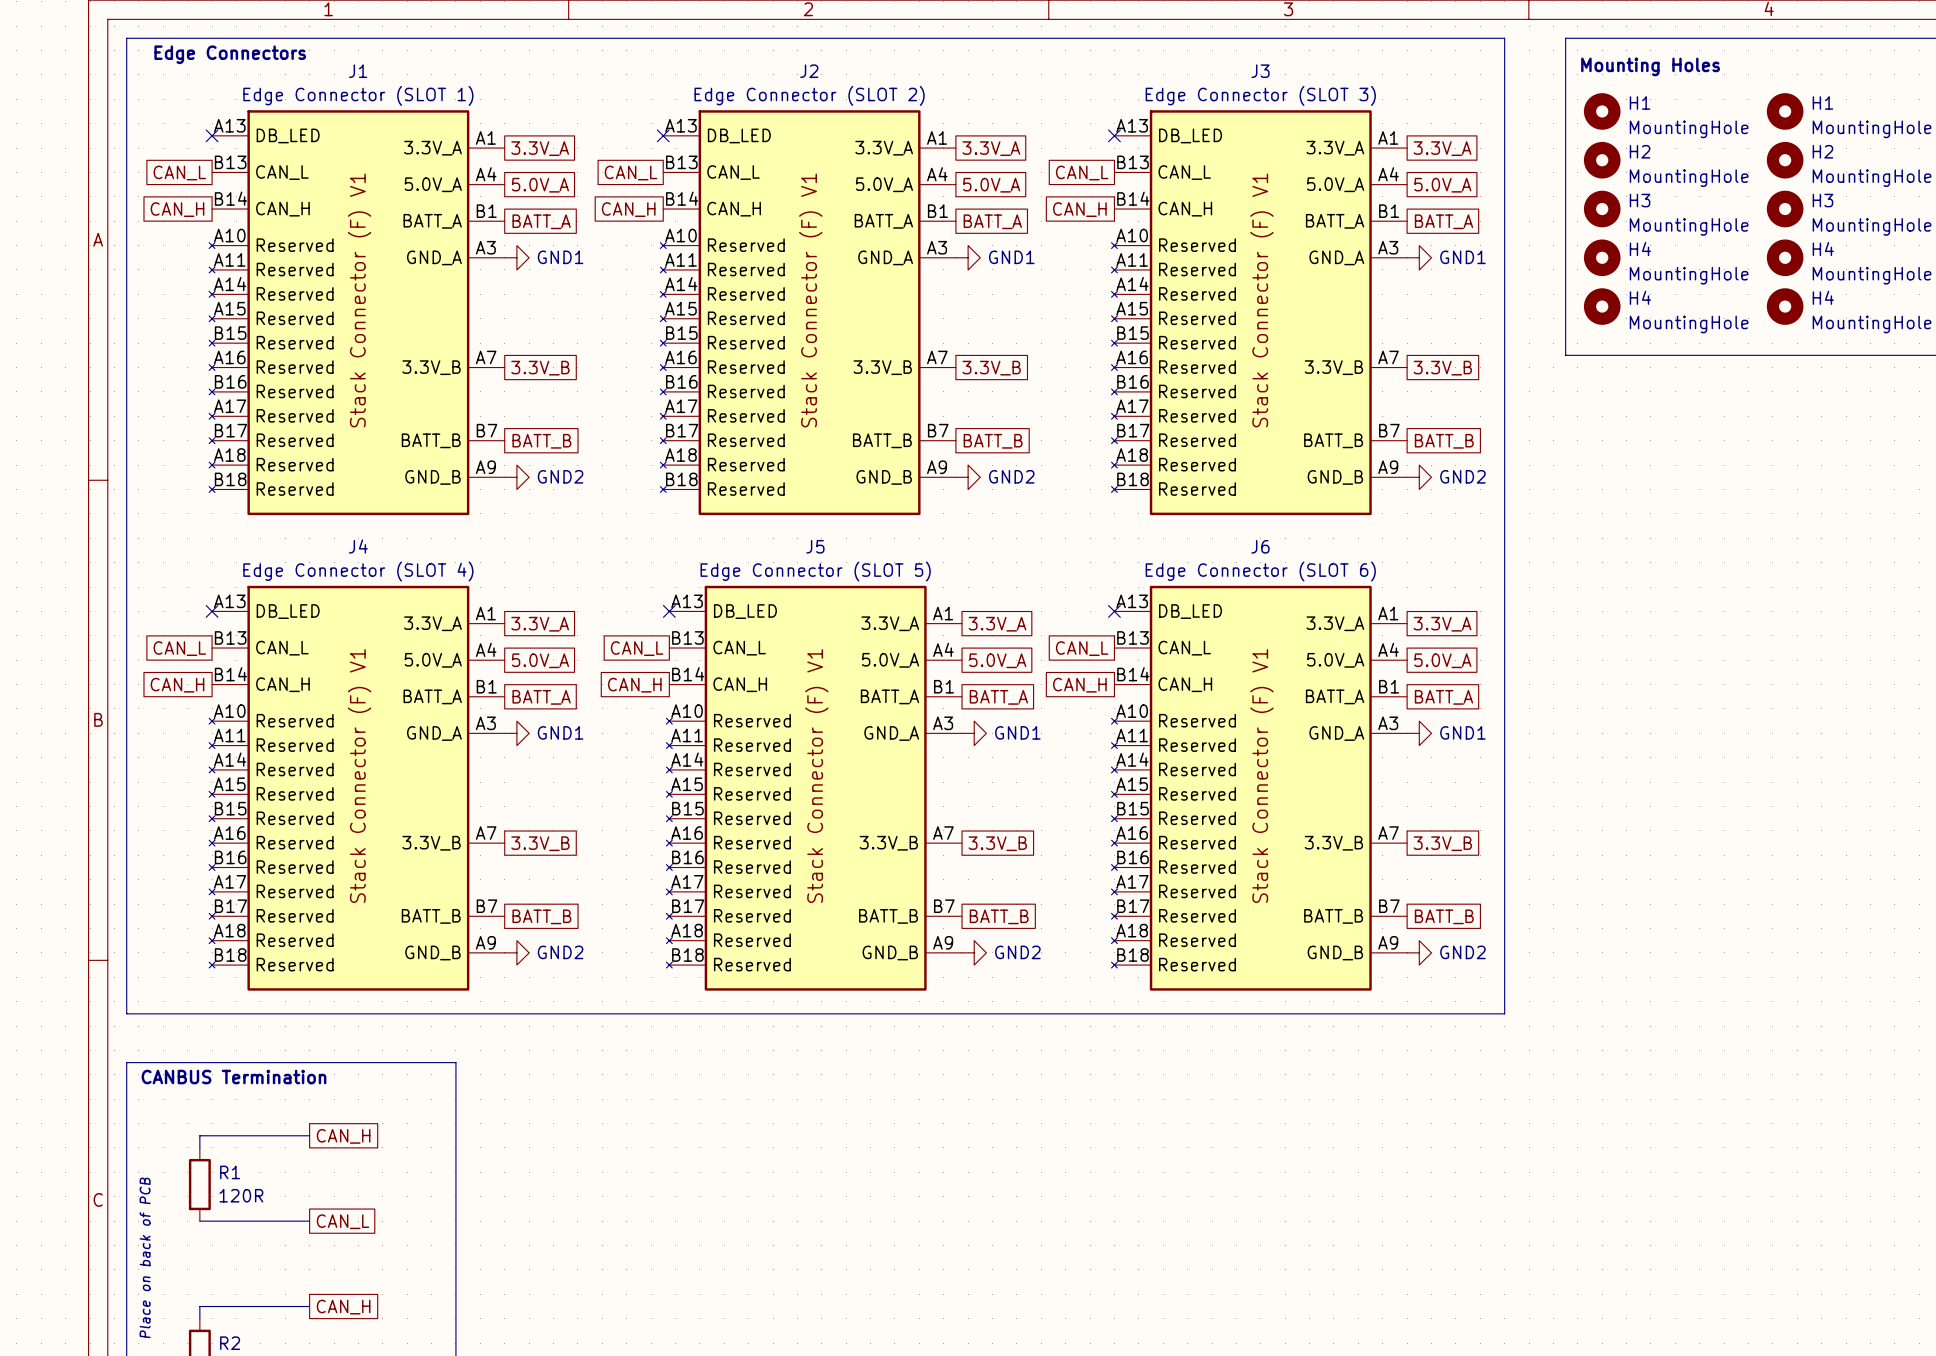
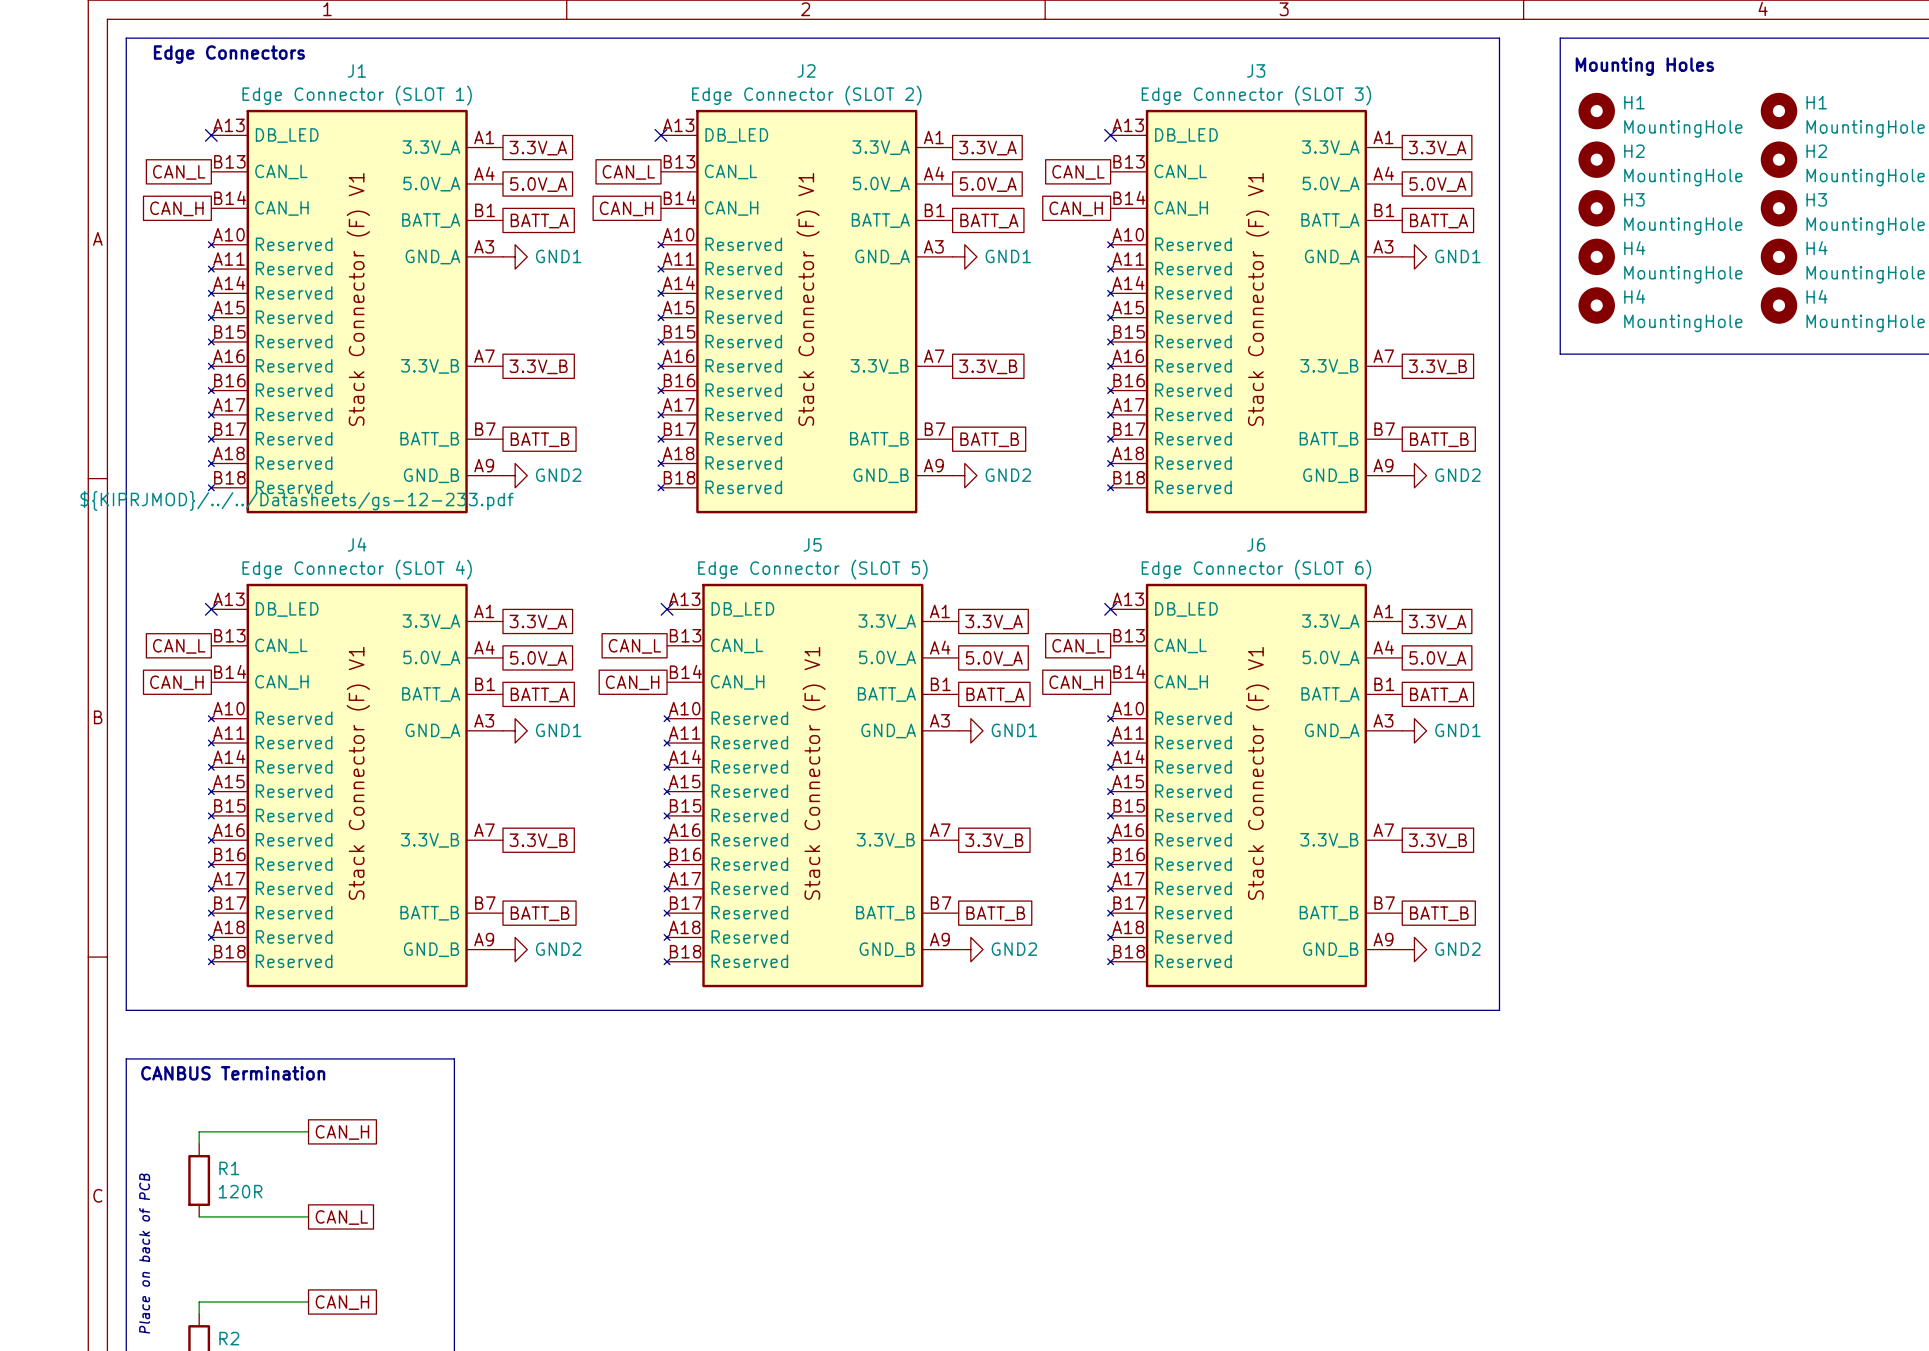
J1 text: none -> ${KIPRJMOD}/../../Datasheets/gs-12-233.pdf (296, 500)

